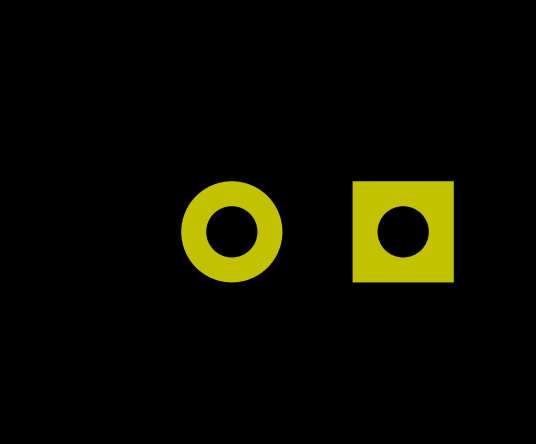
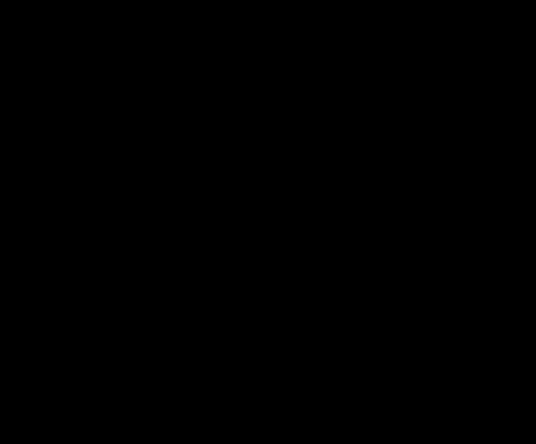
part: (317, 231) -> none

